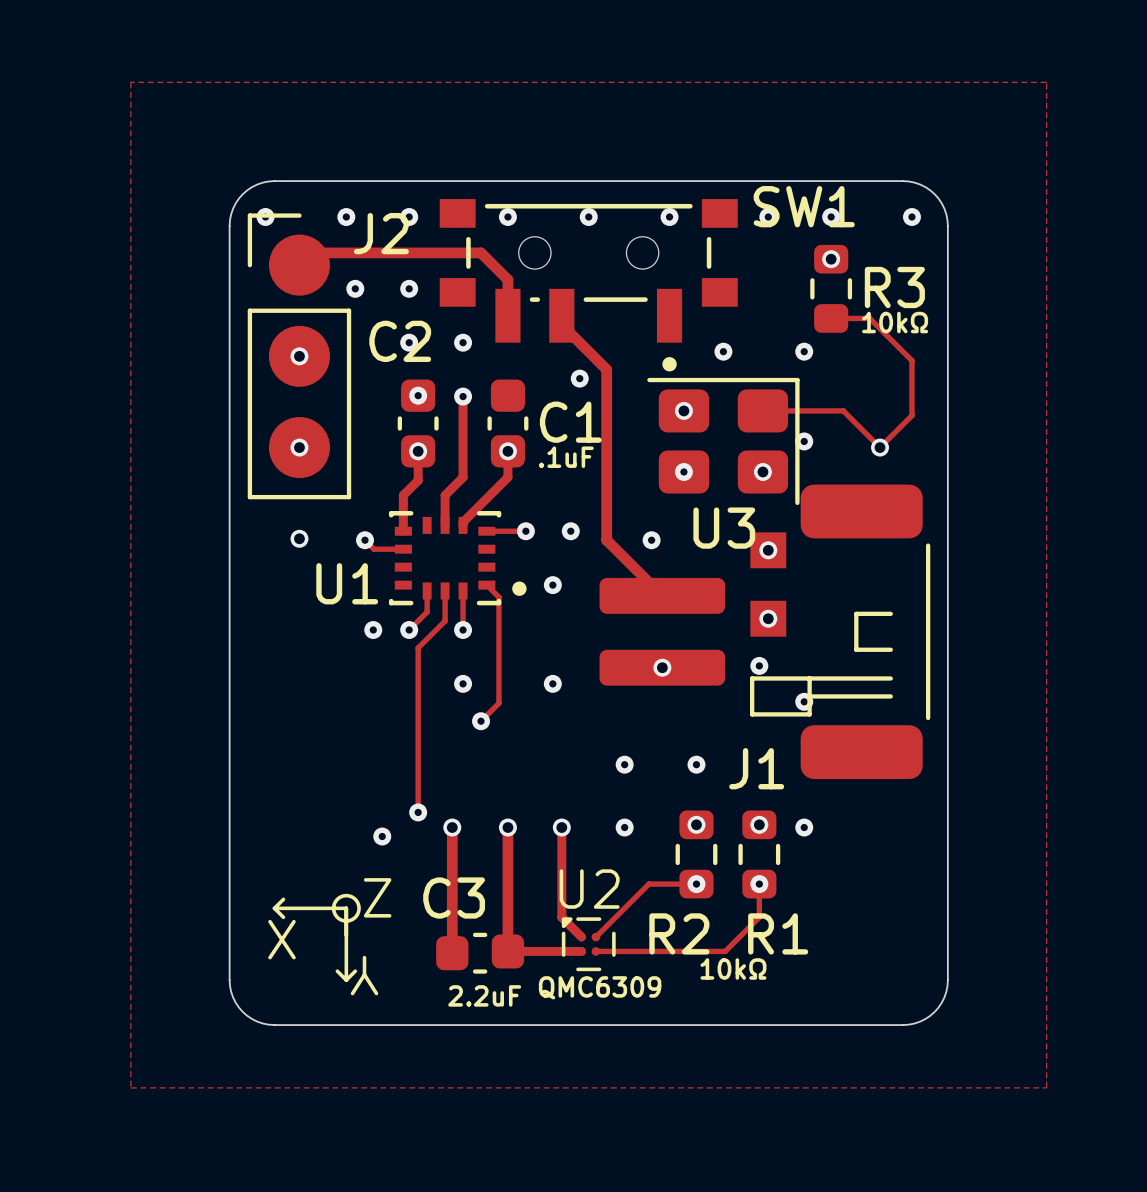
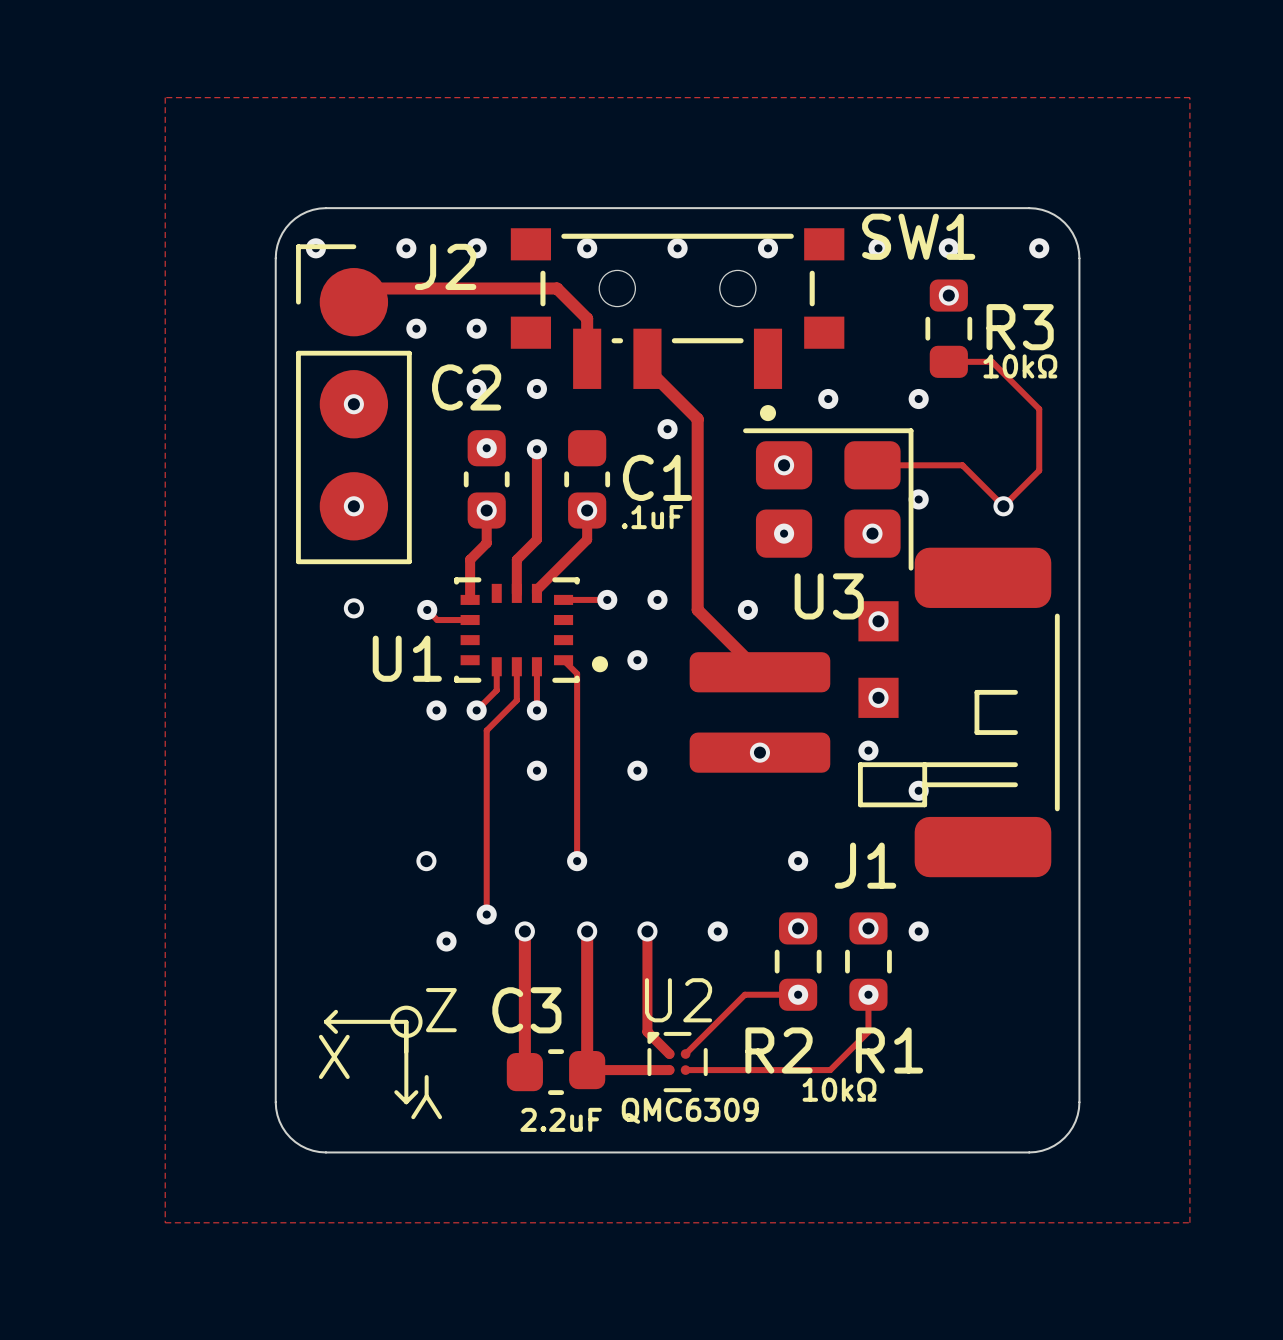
track: (498, 703) (481, 721) -> (577, 792) (577, 861)
via position: (481, 721) -> (577, 861)
via: none -> (426, 861)
via: (624, 764) -> none

